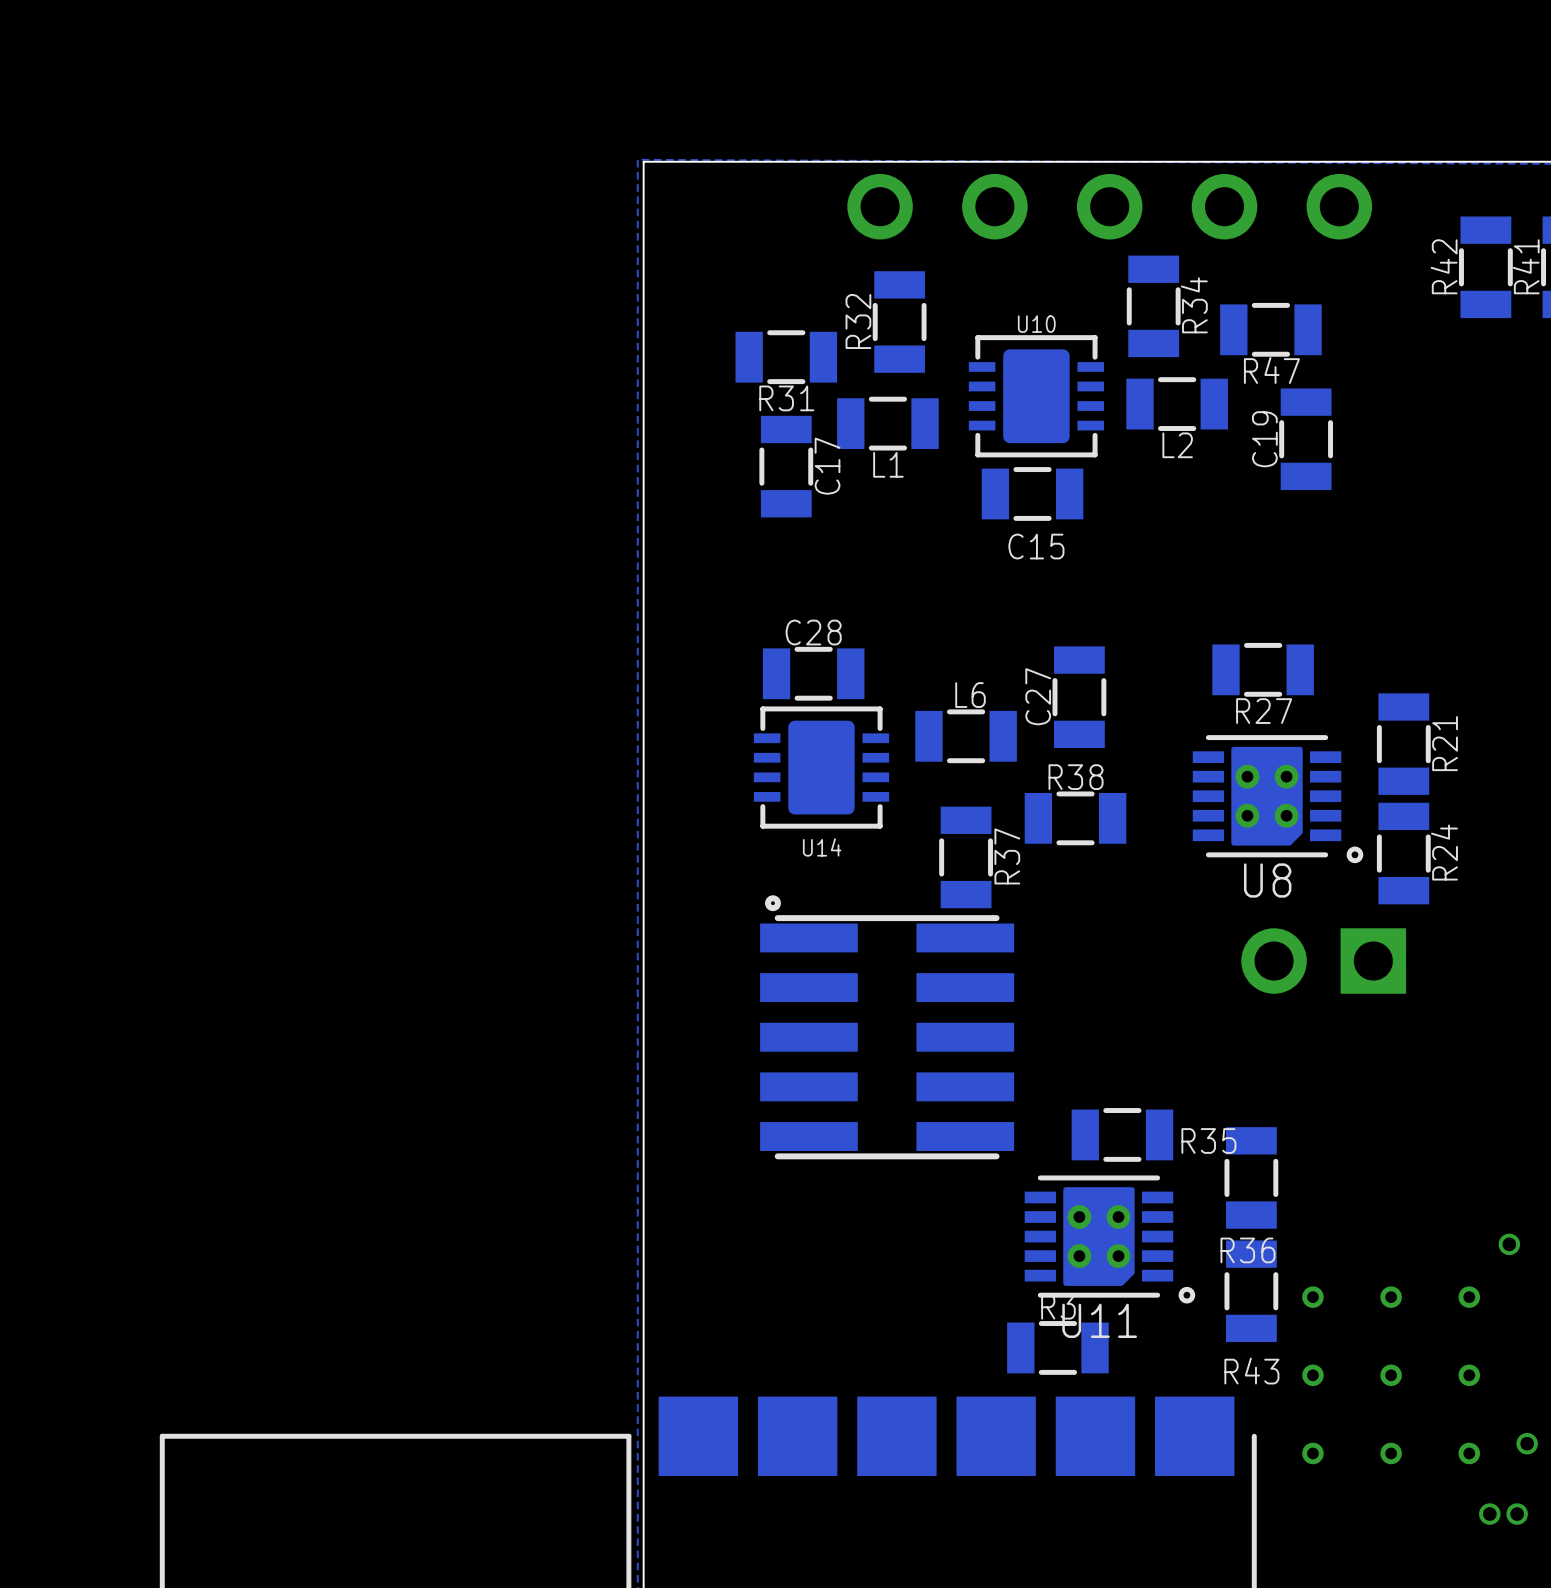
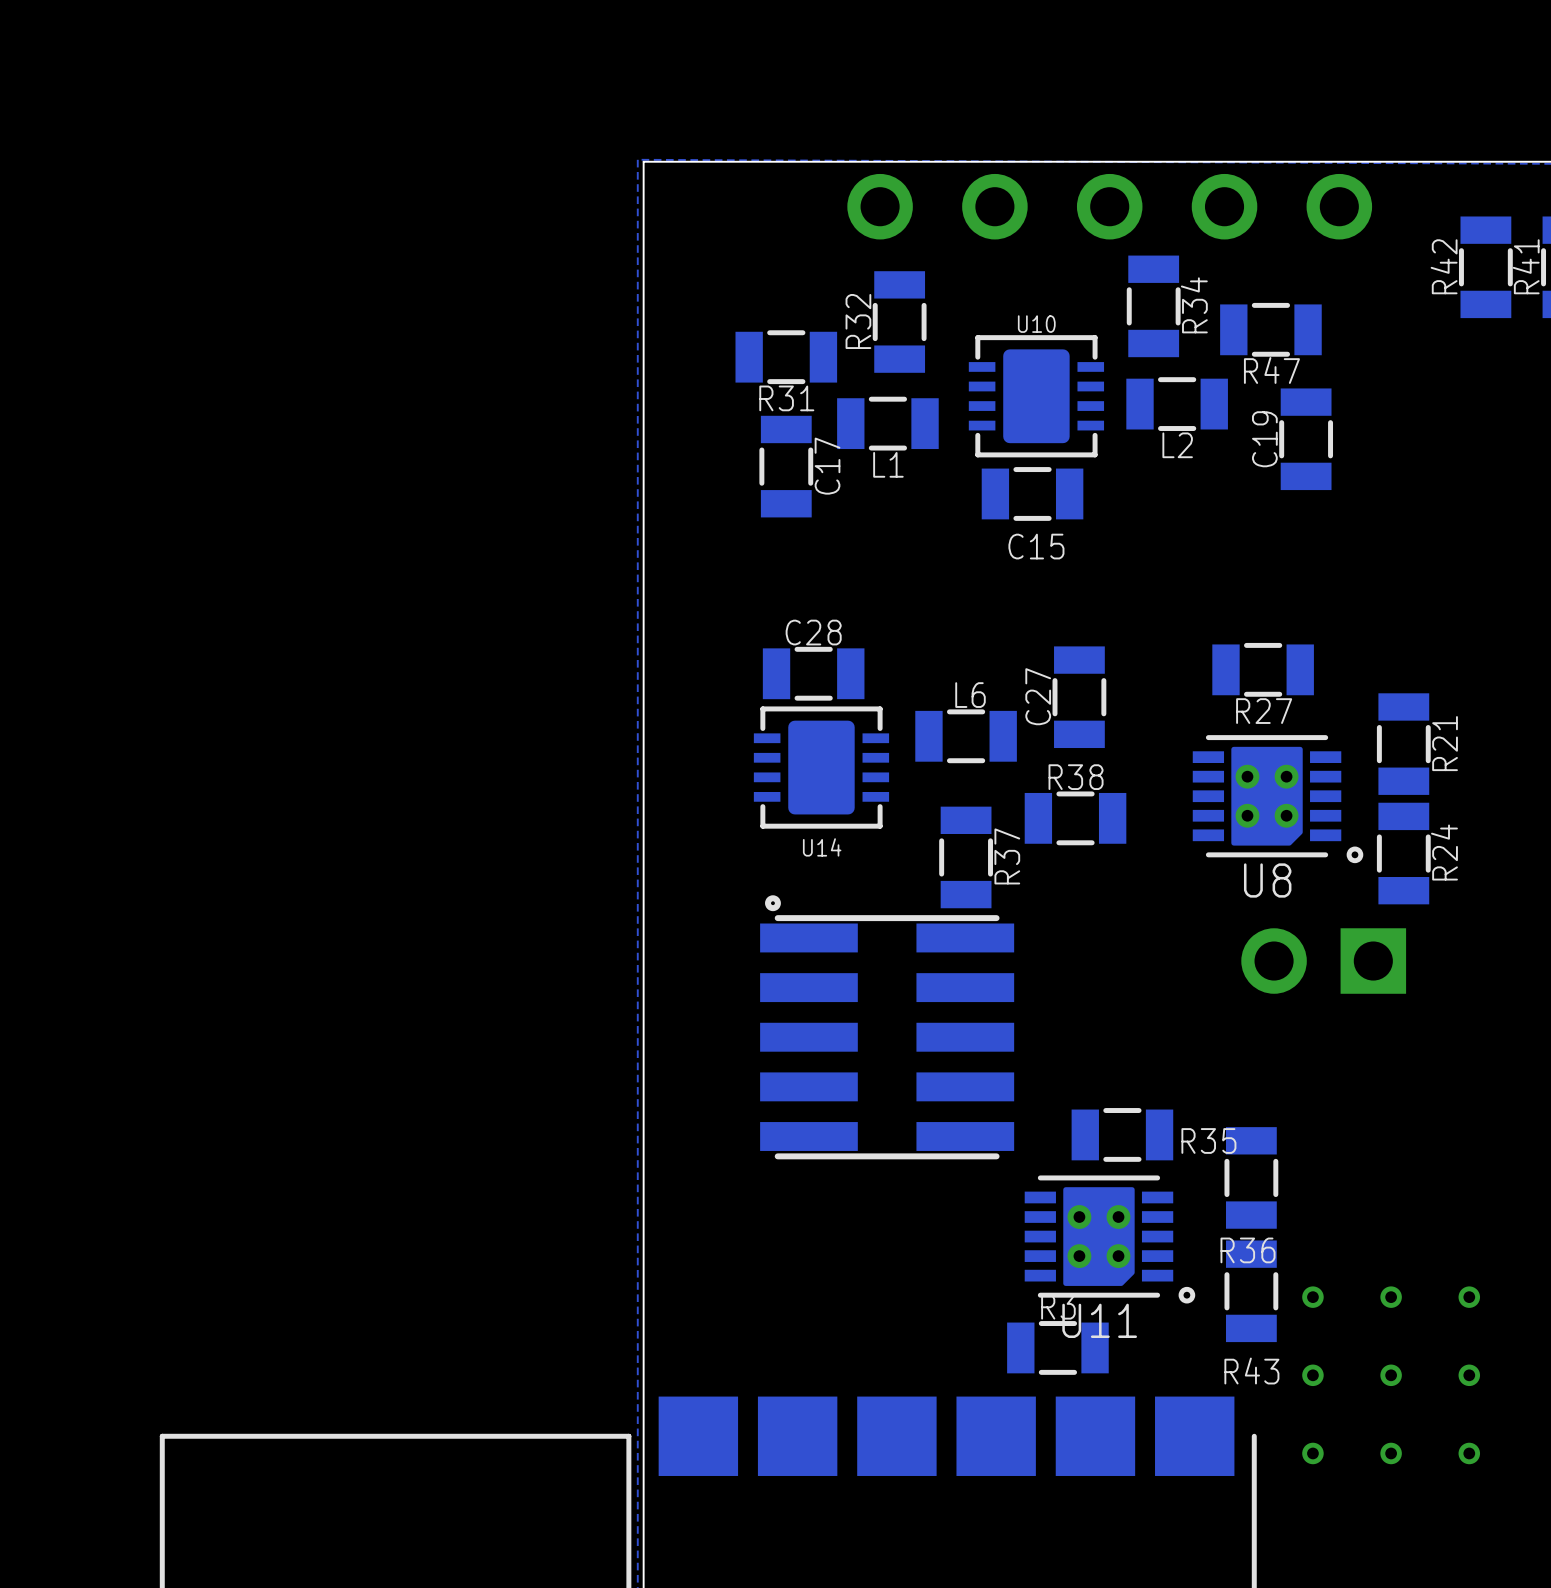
via: (1509, 1244) -> none
via: (1527, 1443) -> none
via: (1489, 1514) -> none
via: (1517, 1514) -> none

